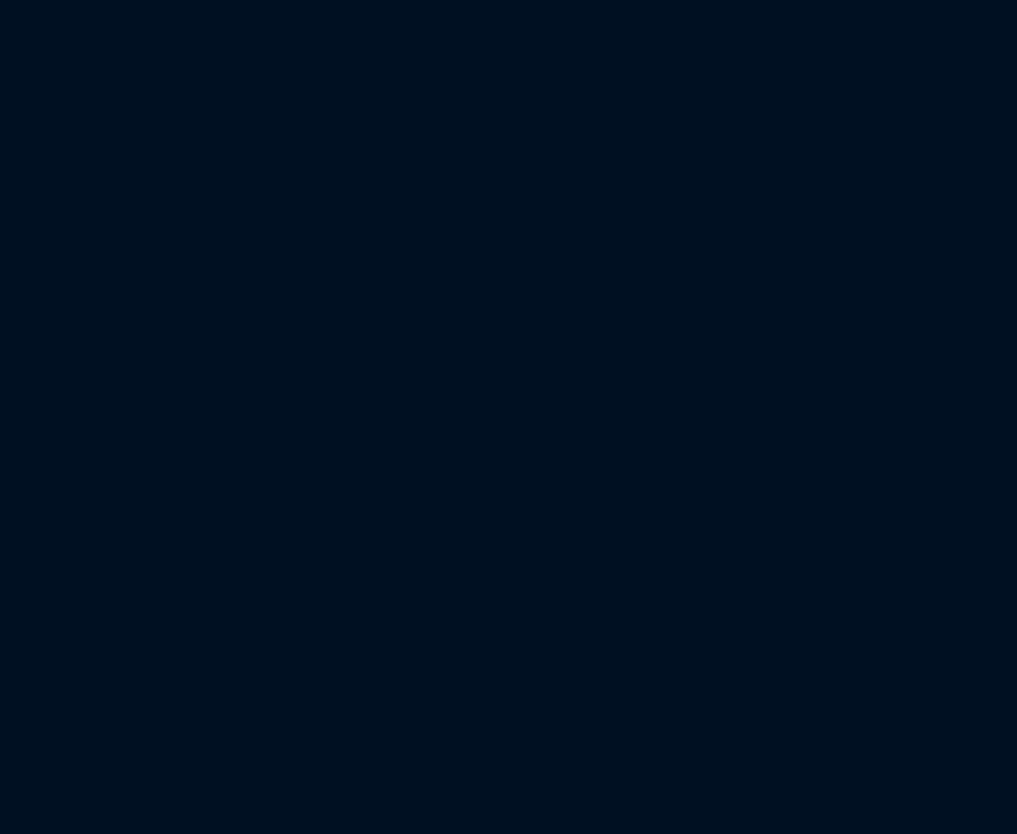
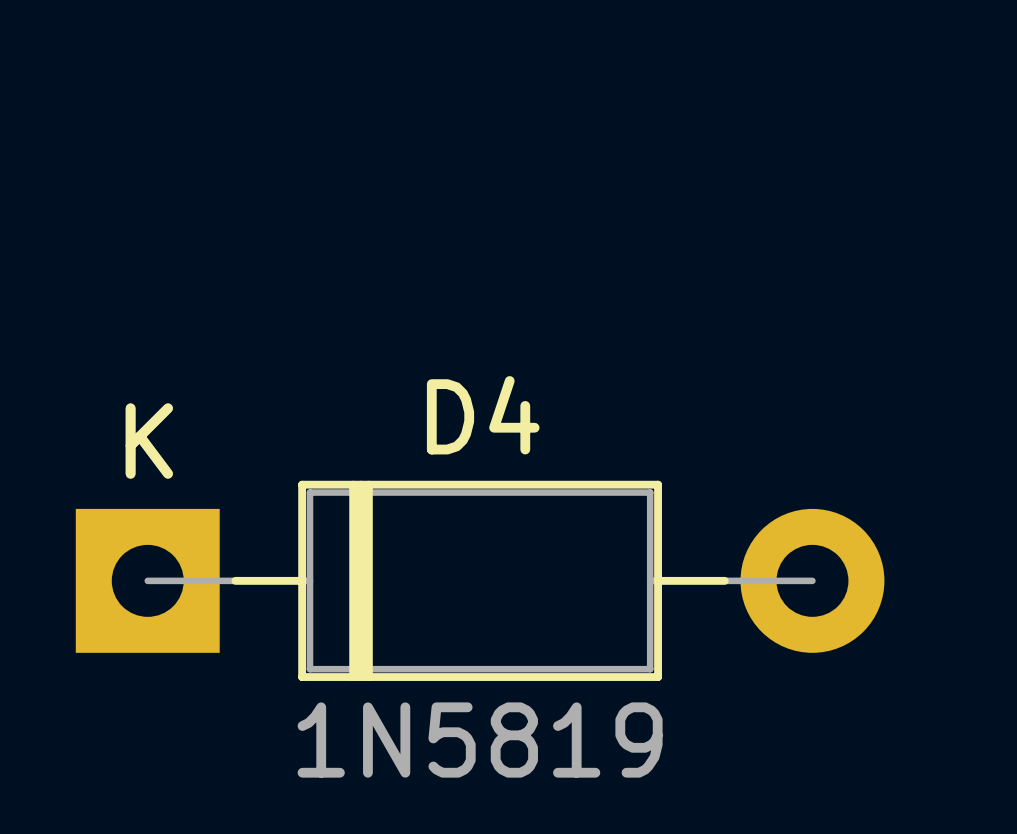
D4: none -> 1N5819 (480, 580)

